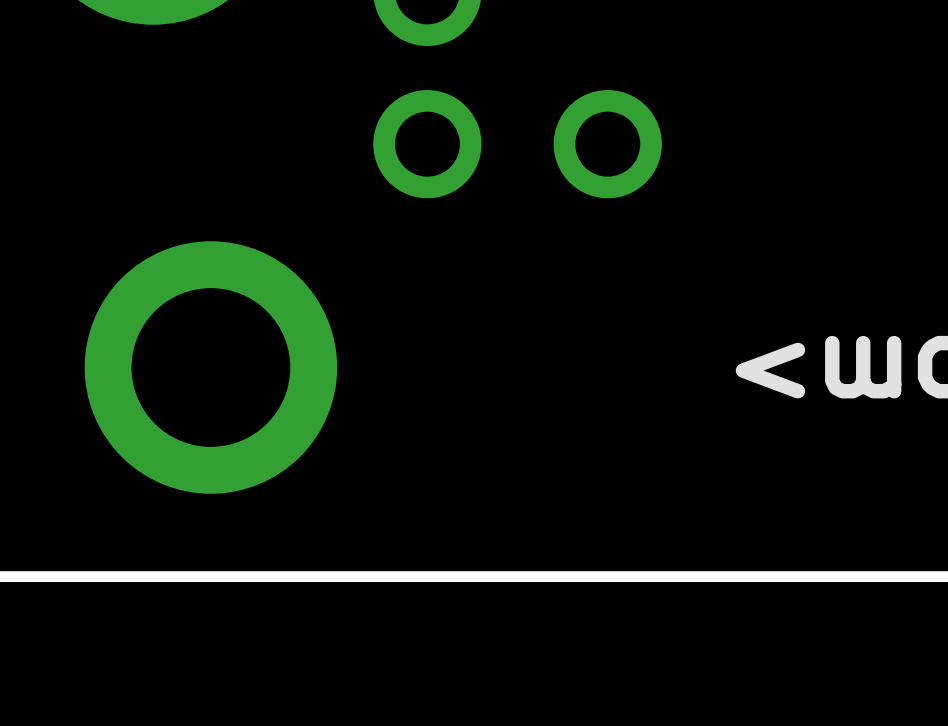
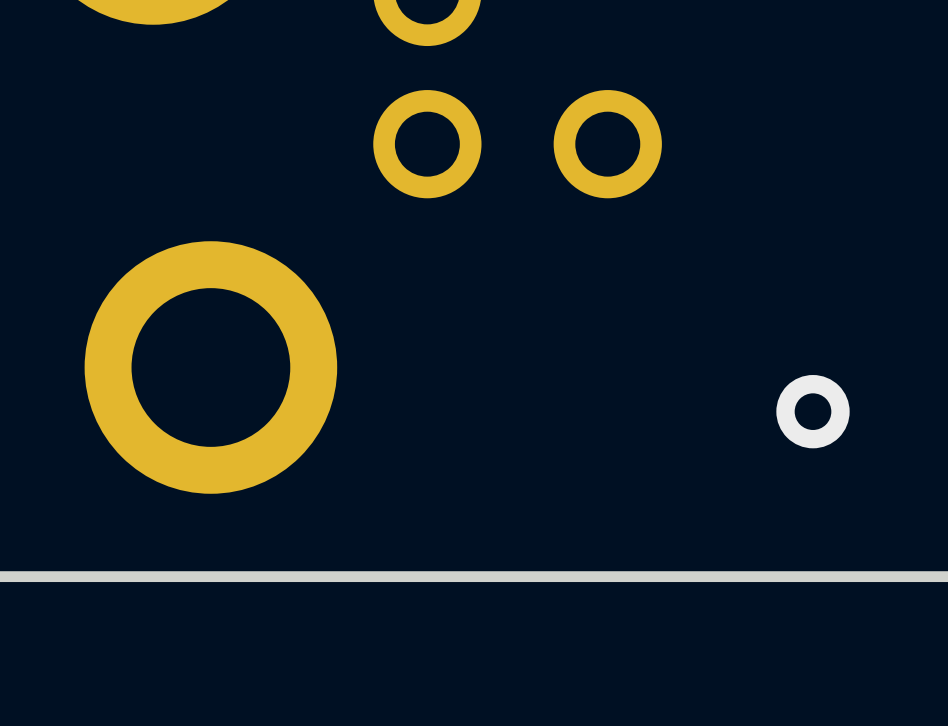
via: none -> (813, 411)

